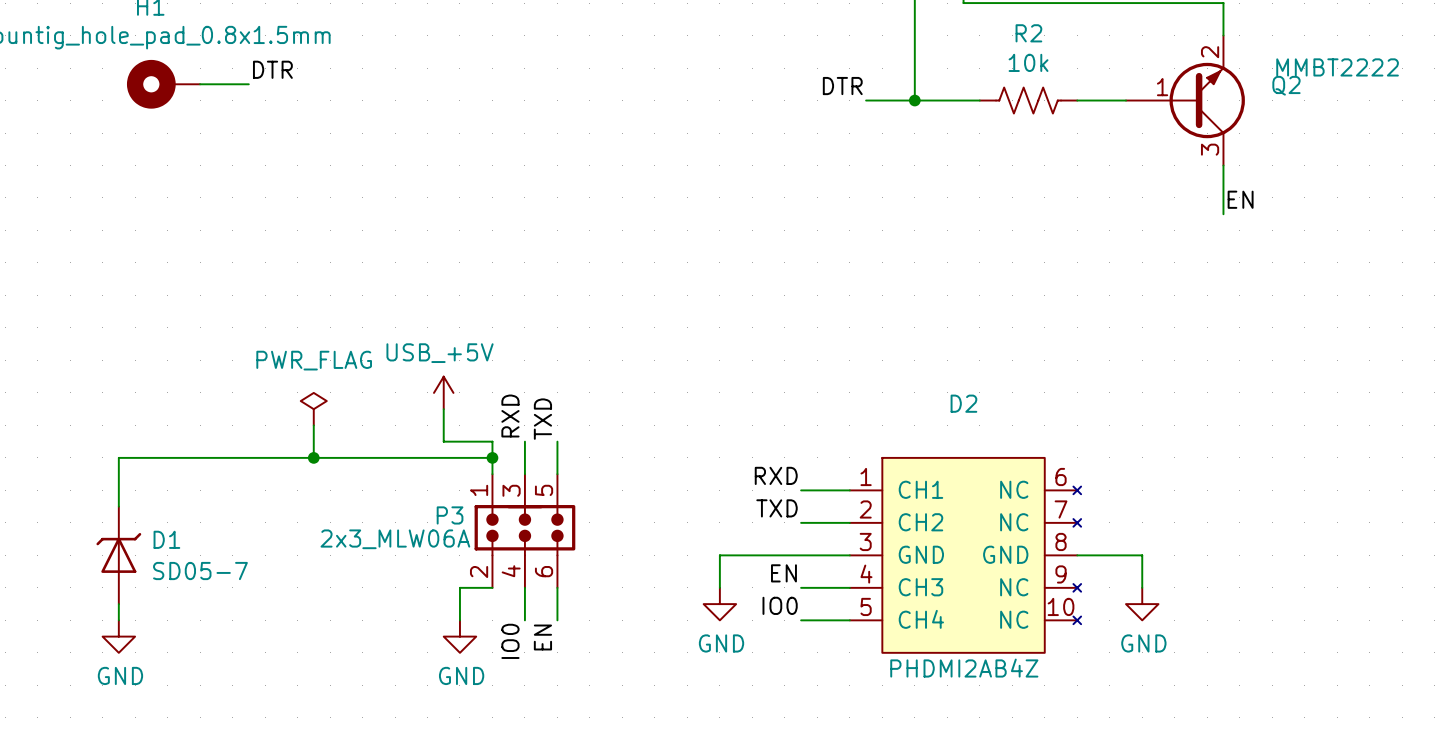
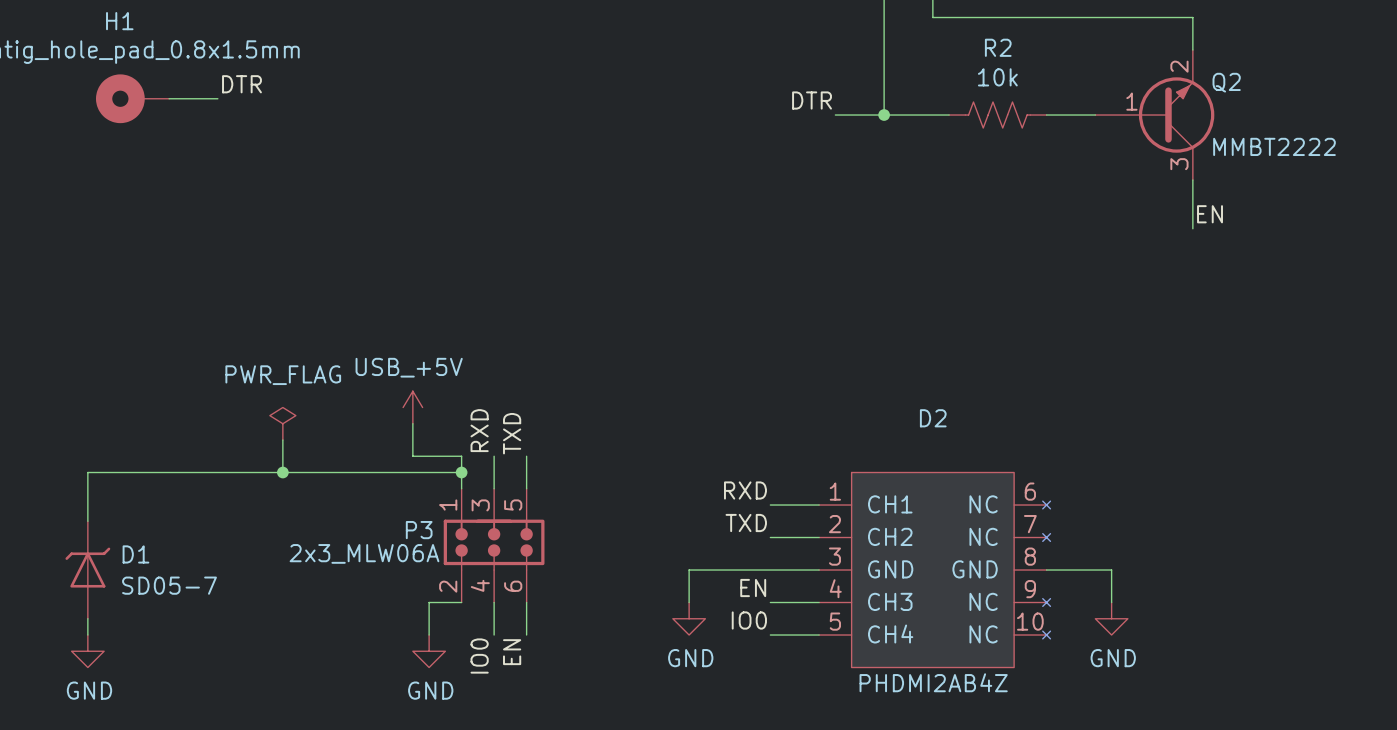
Q2 value position: MMBT2222 (1337, 67) -> MMBT2222 (1274, 146)
Q2 name position: Q2 (1286, 85) -> Q2 (1226, 82)

